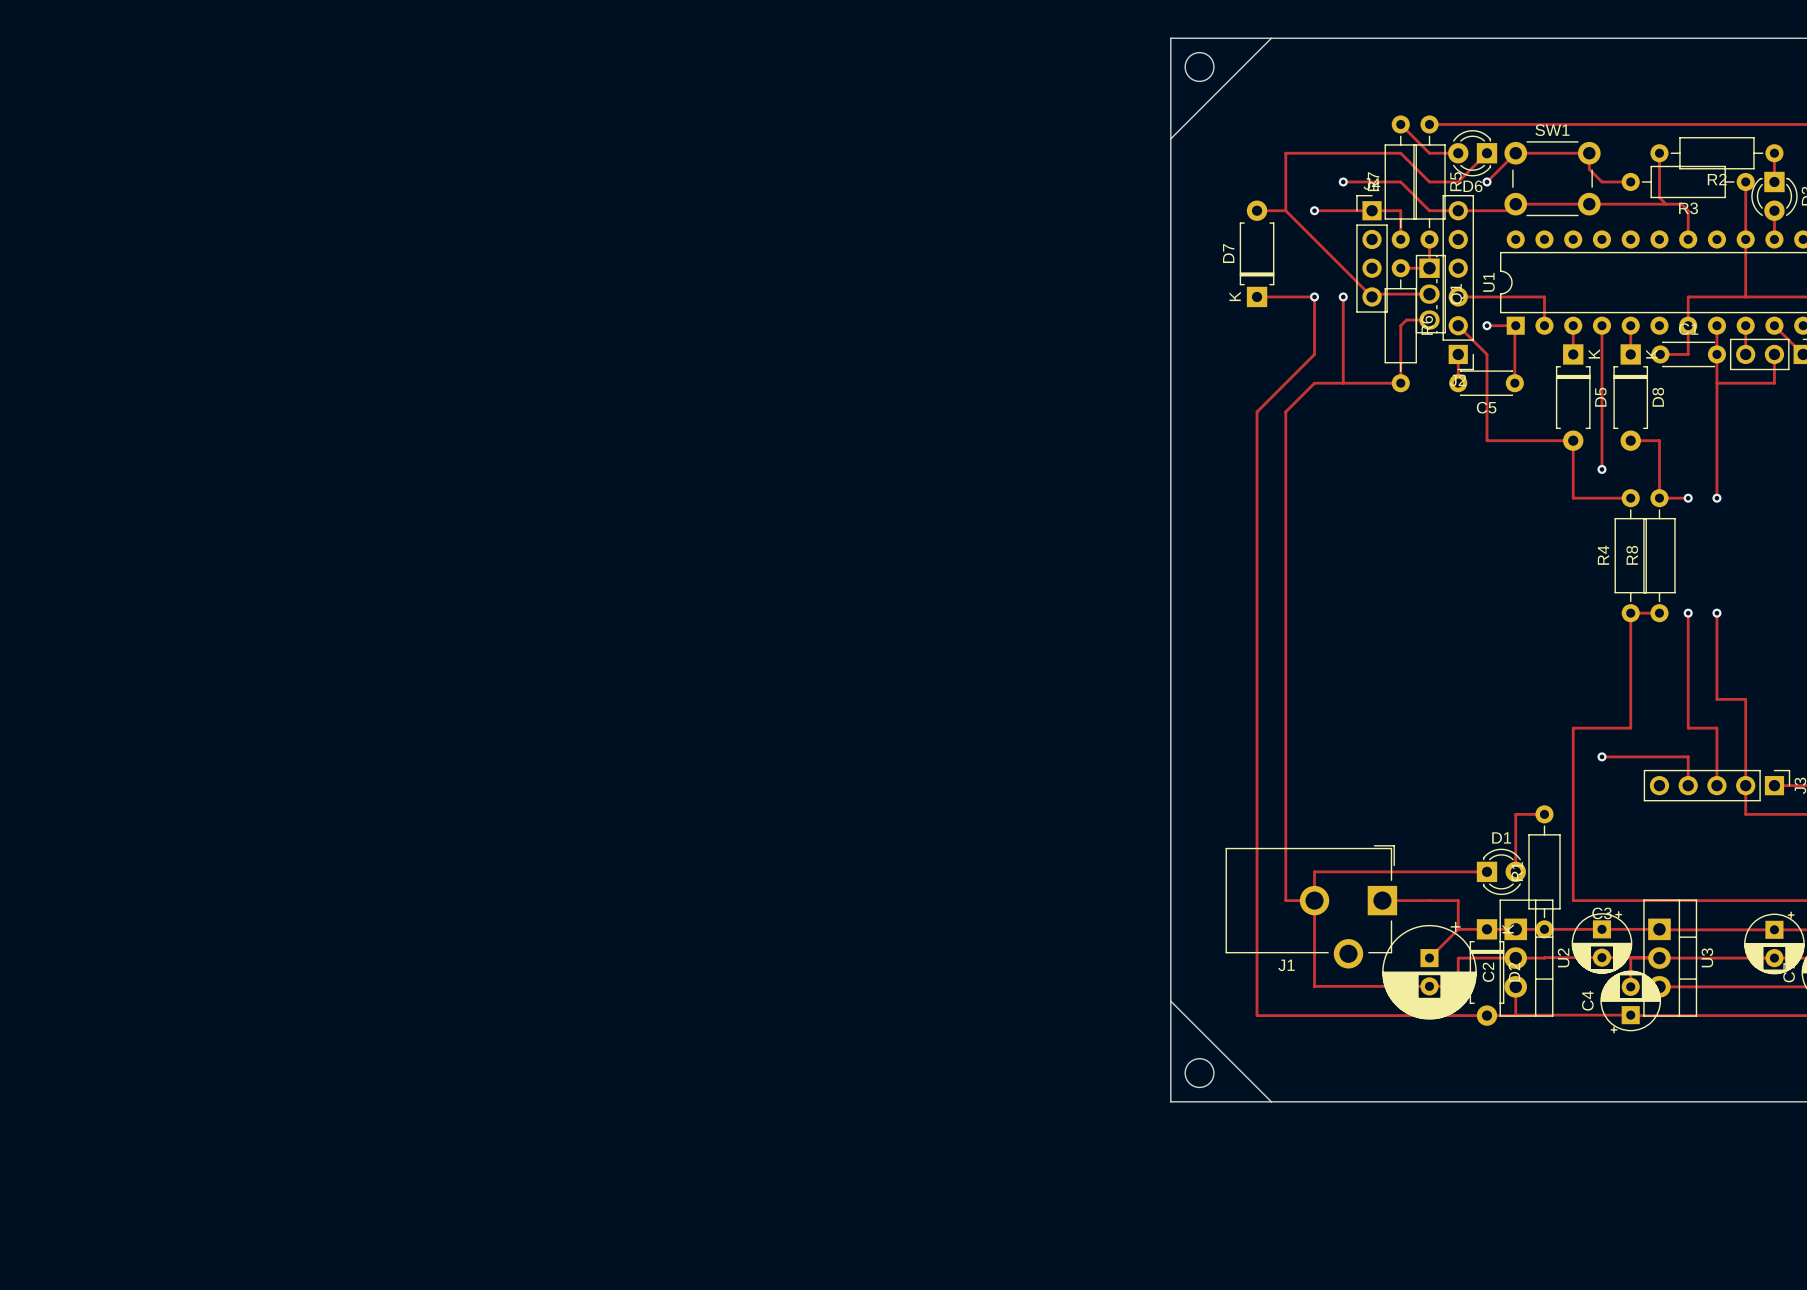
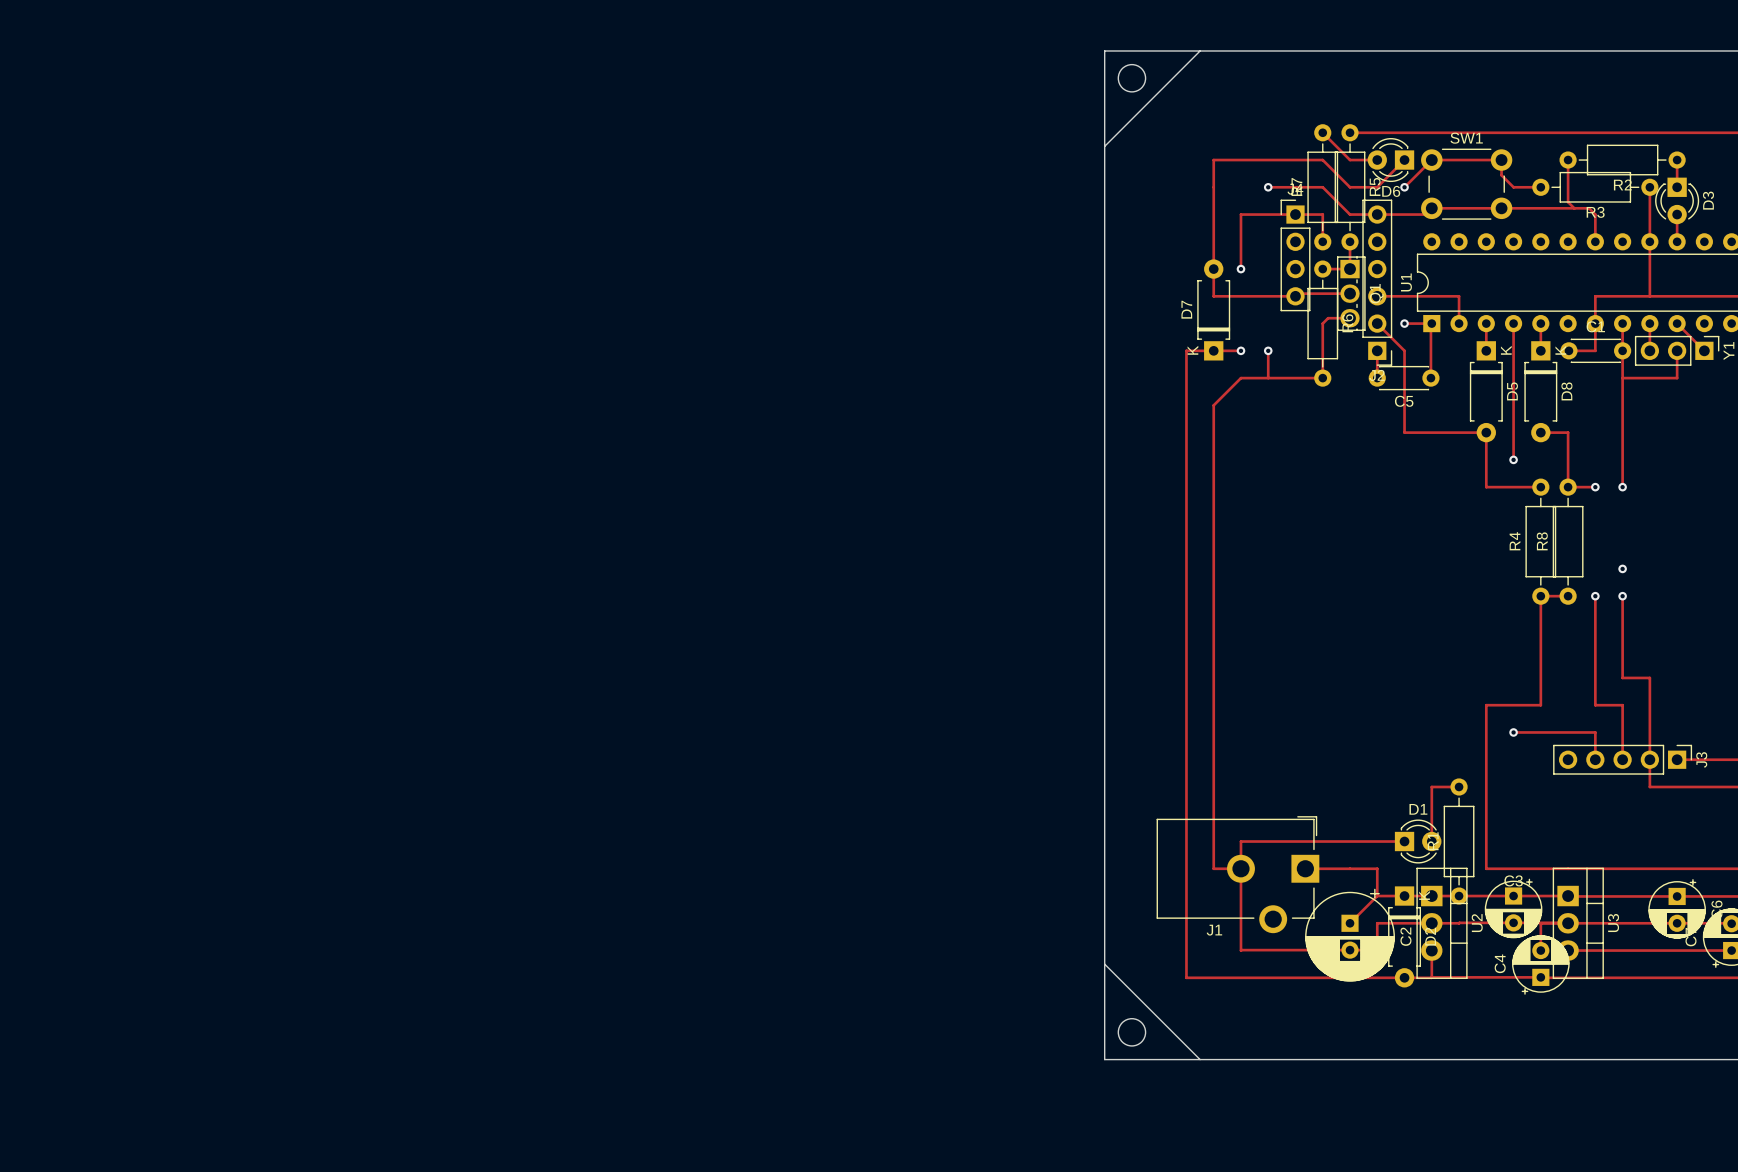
track: (1257, 210) (1285, 210) (1372, 296) -> (1240, 296) (1295, 296)
via: (1314, 210) -> none
D7 position: (1257, 253) -> (1213, 309)
via: none -> (1240, 269)
track: (1257, 296) (1285, 296) -> (1213, 214) (1213, 296)
track: (1314, 296) (1314, 354) (1257, 411) -> (1240, 350) (1186, 350) (1186, 405)
via: (1314, 296) -> none
track: (1343, 296) (1343, 354) -> (1240, 214) (1240, 269)
via: (1343, 296) -> none
via: none -> (1240, 350)
via: none -> (1268, 350)
via: none -> (1622, 568)

